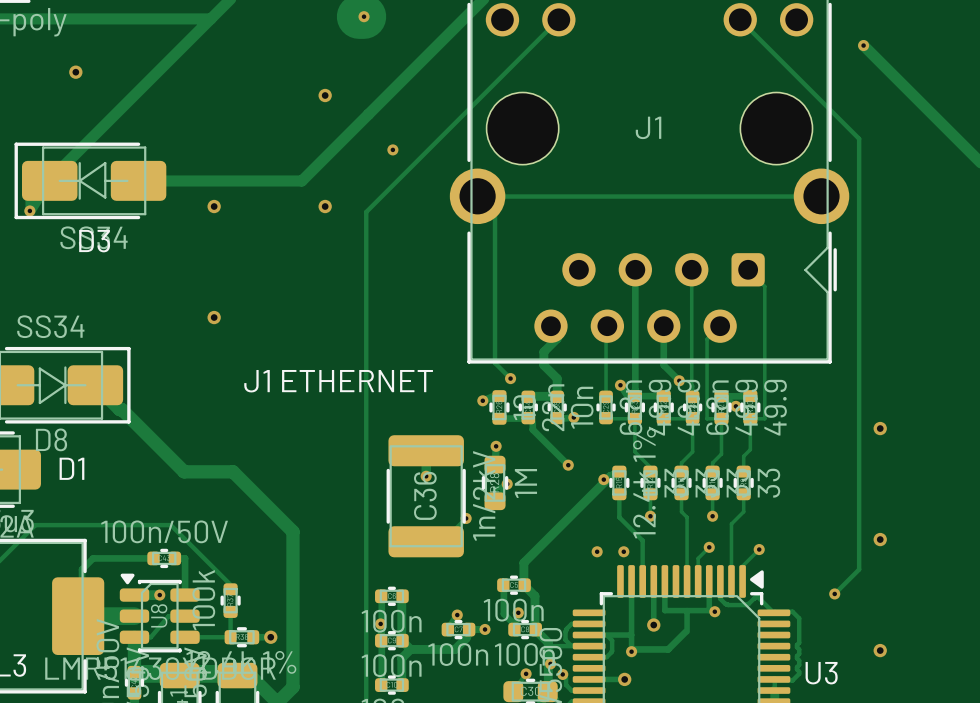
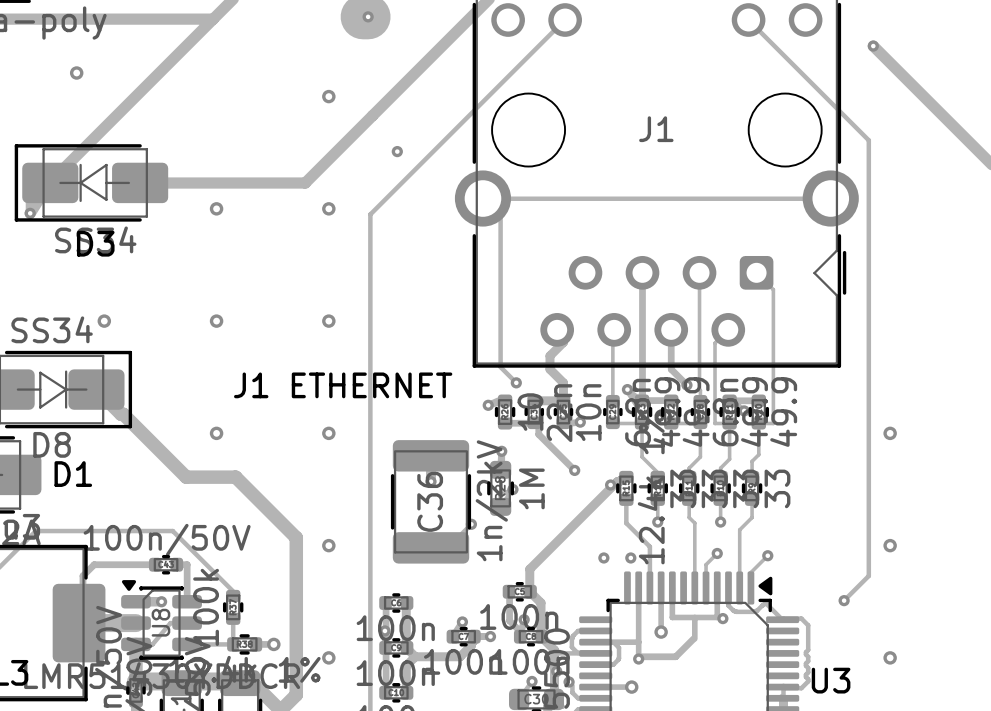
via: none -> (104, 321)
via: none -> (328, 321)
via: none -> (216, 433)
via: none -> (328, 433)
via: none -> (328, 545)
via: none -> (328, 657)

